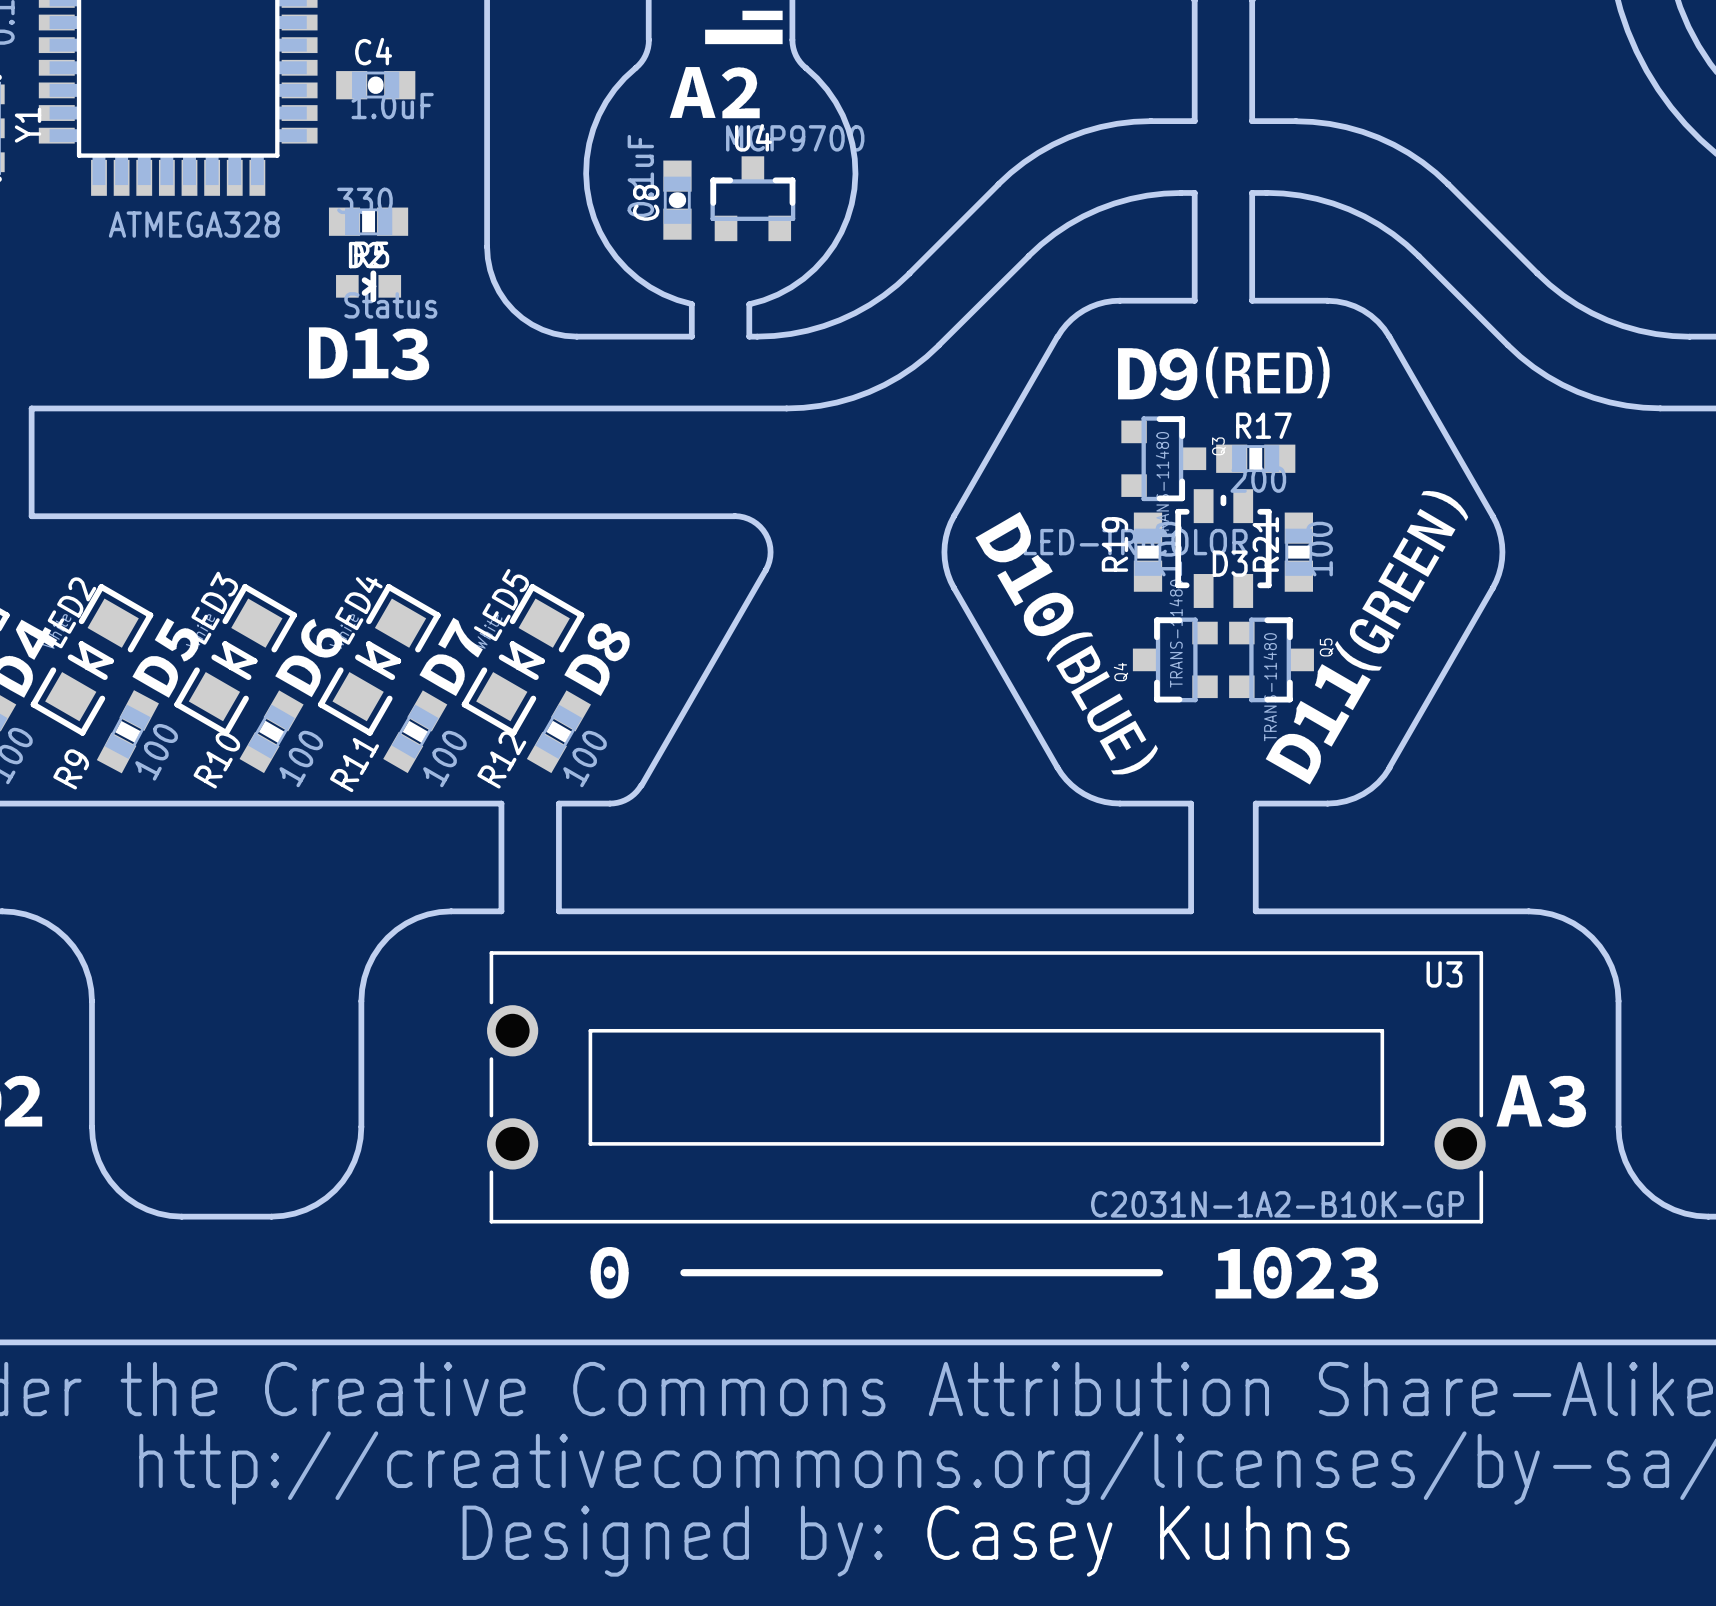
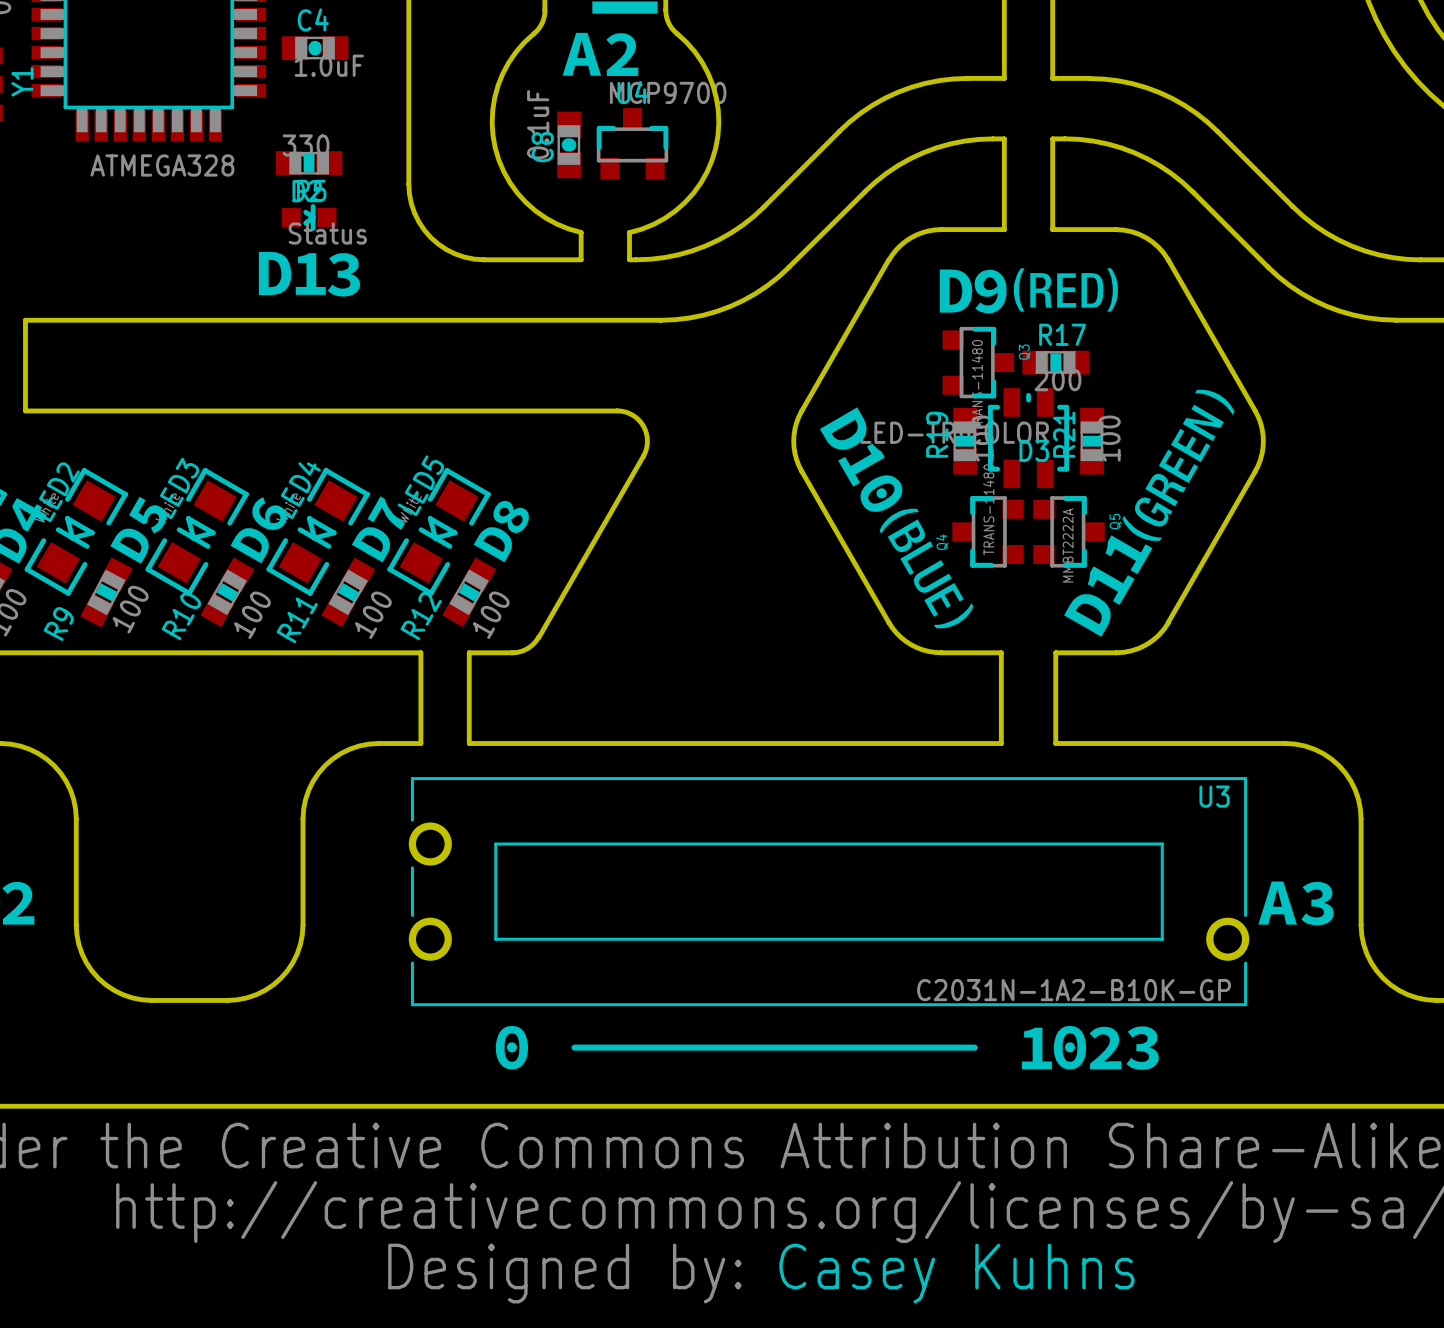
Q5 value: TRANS-11480 (1270, 687) -> MMBT2222A (1068, 545)

